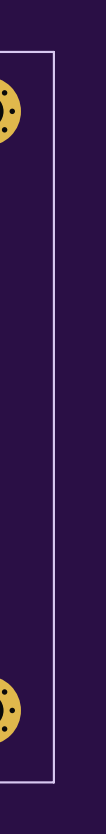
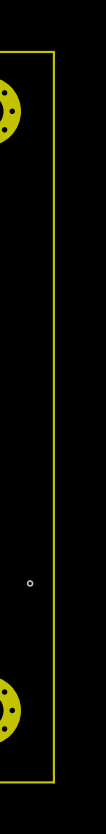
via: none -> (30, 583)

